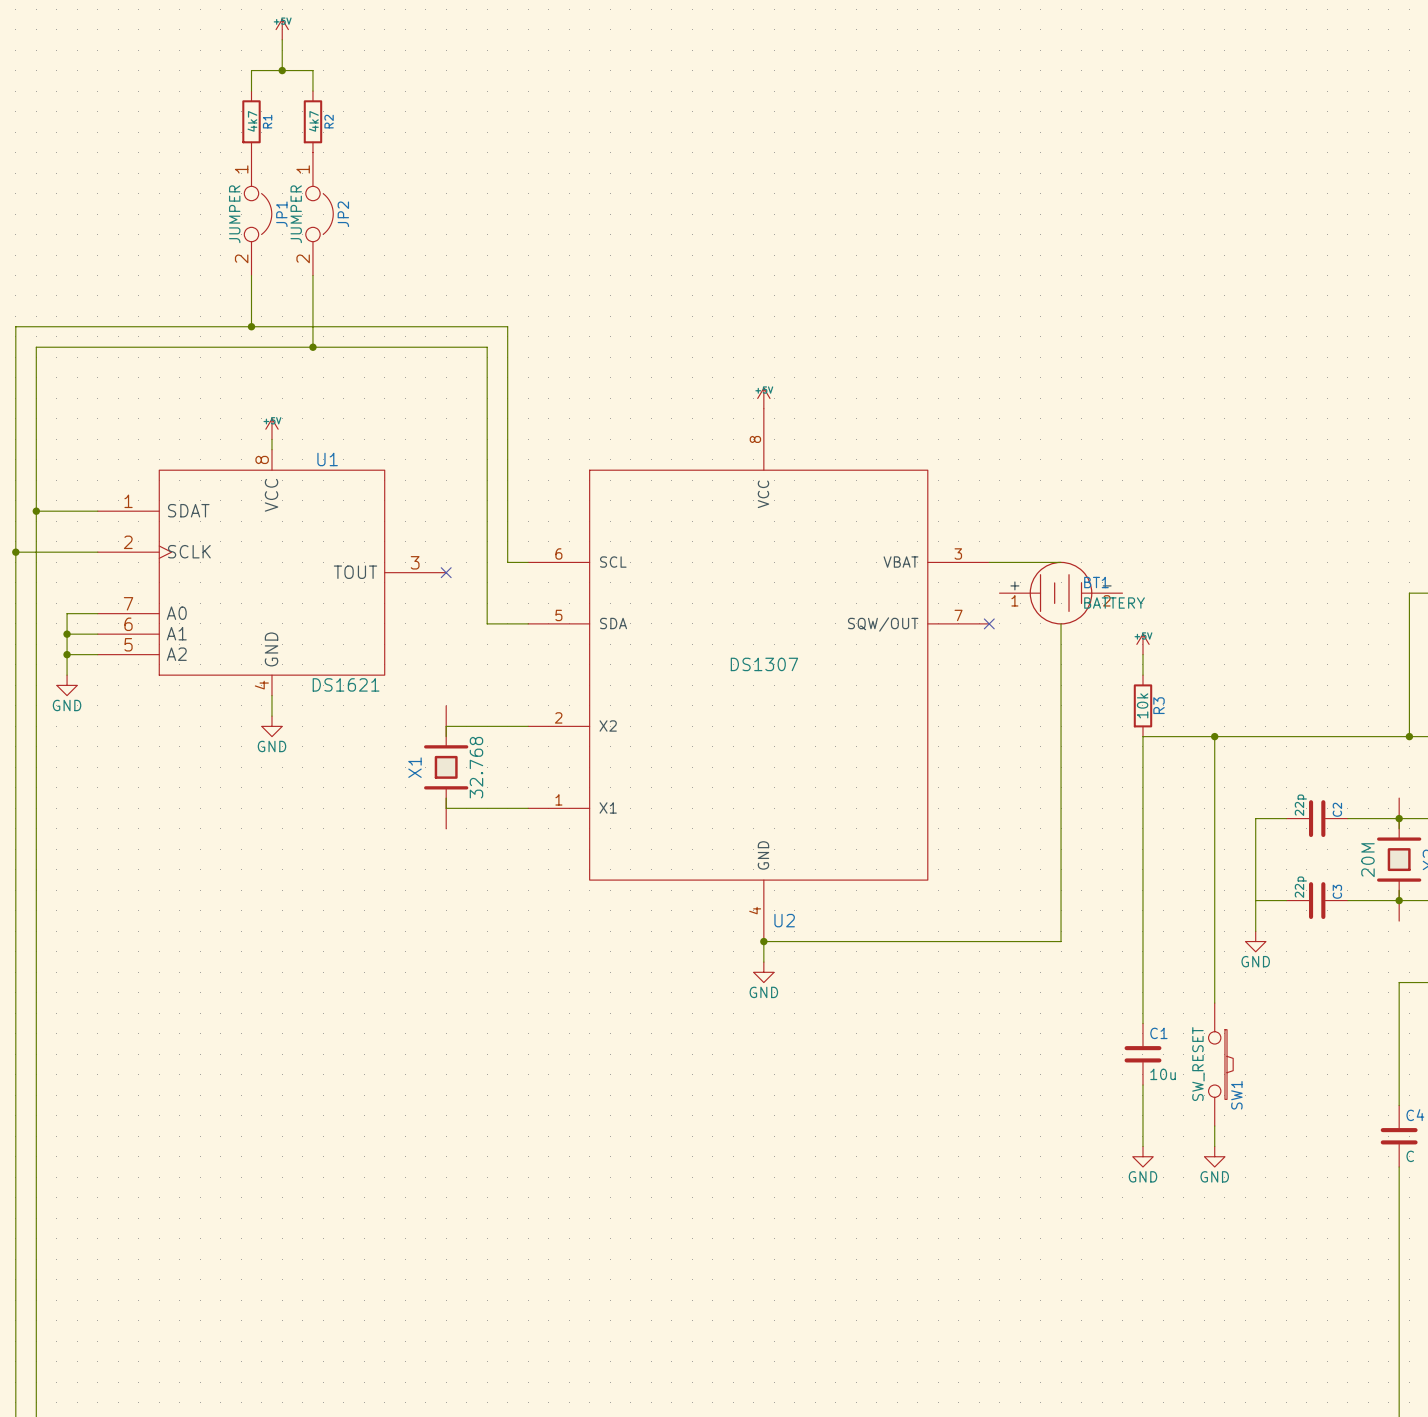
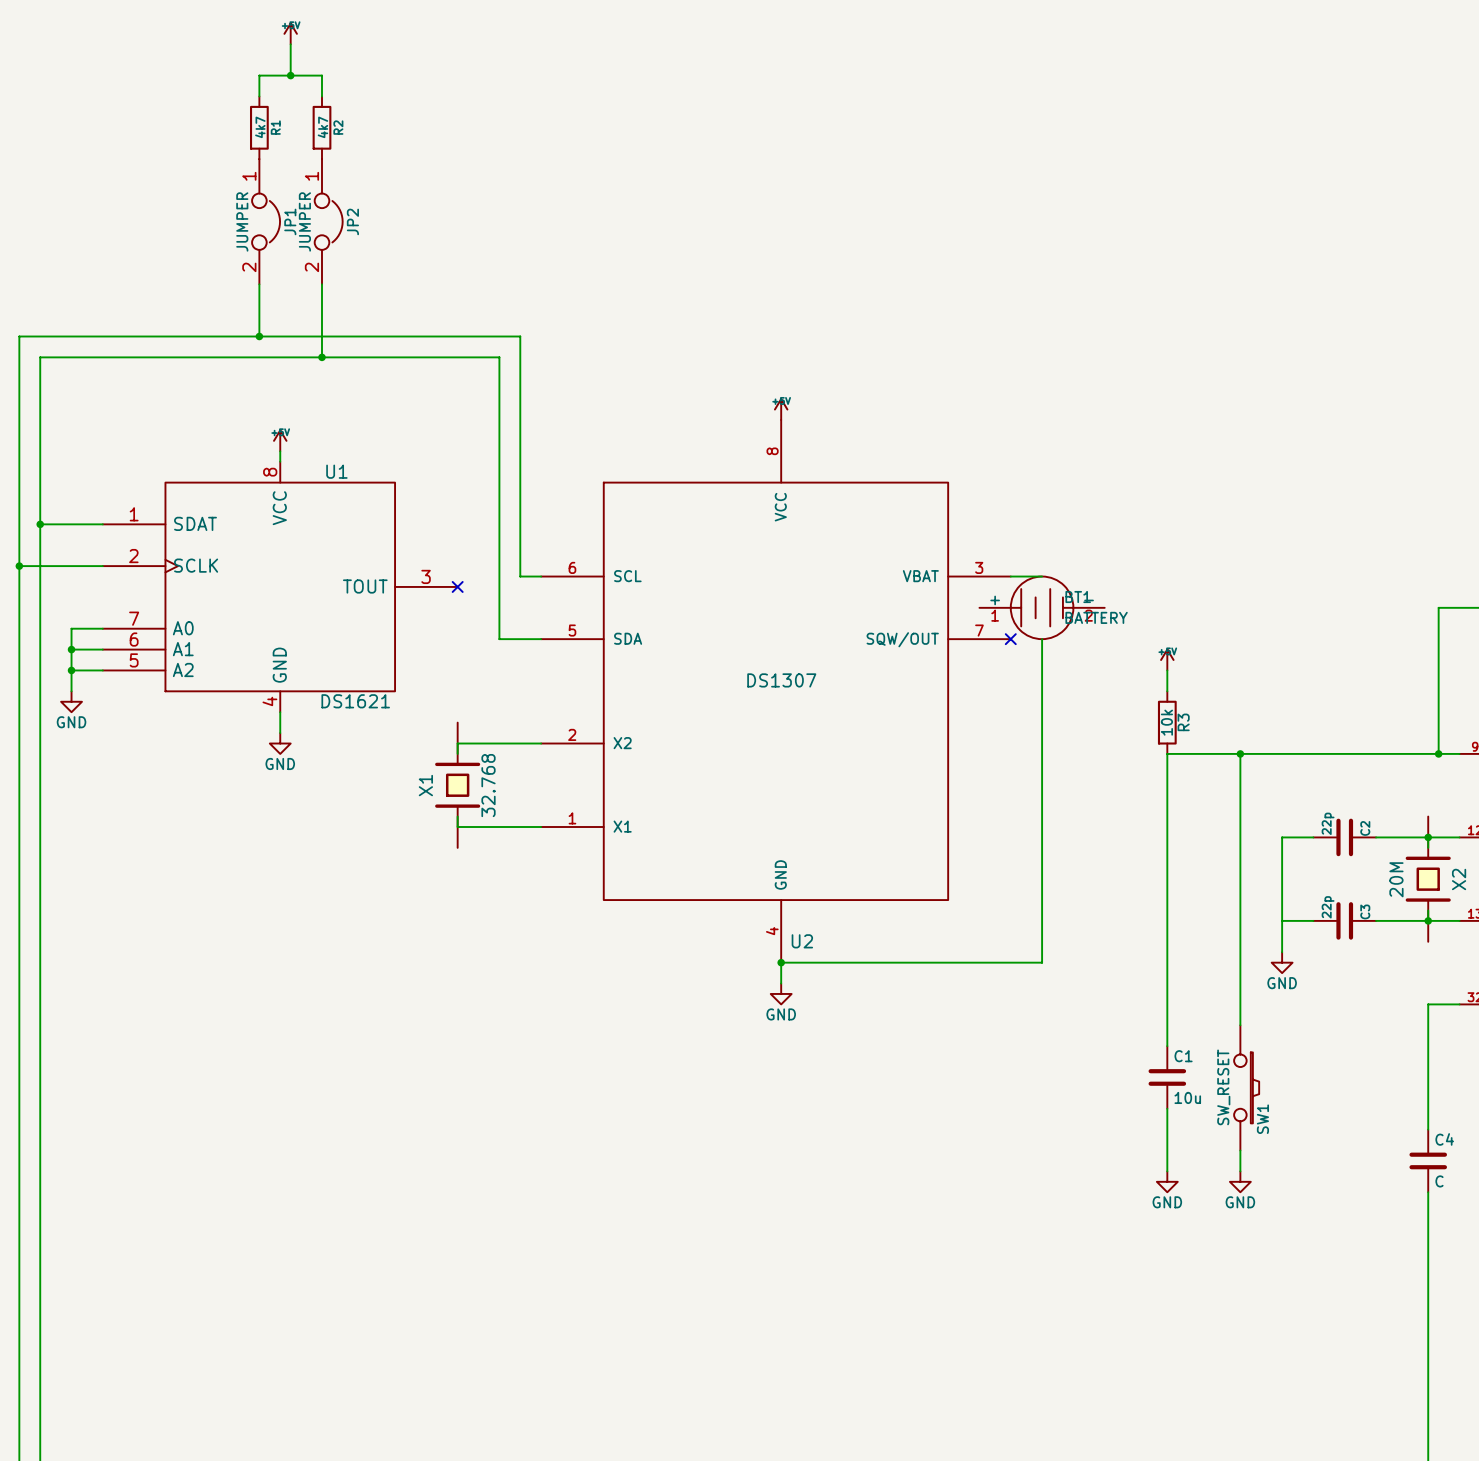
wire: (1020, 562) (1061, 562) -> none
BT1 position: (1061, 593) -> (1042, 607)
wire: (1061, 623) (1061, 941) (1020, 941) -> (1042, 639) (1042, 962)

